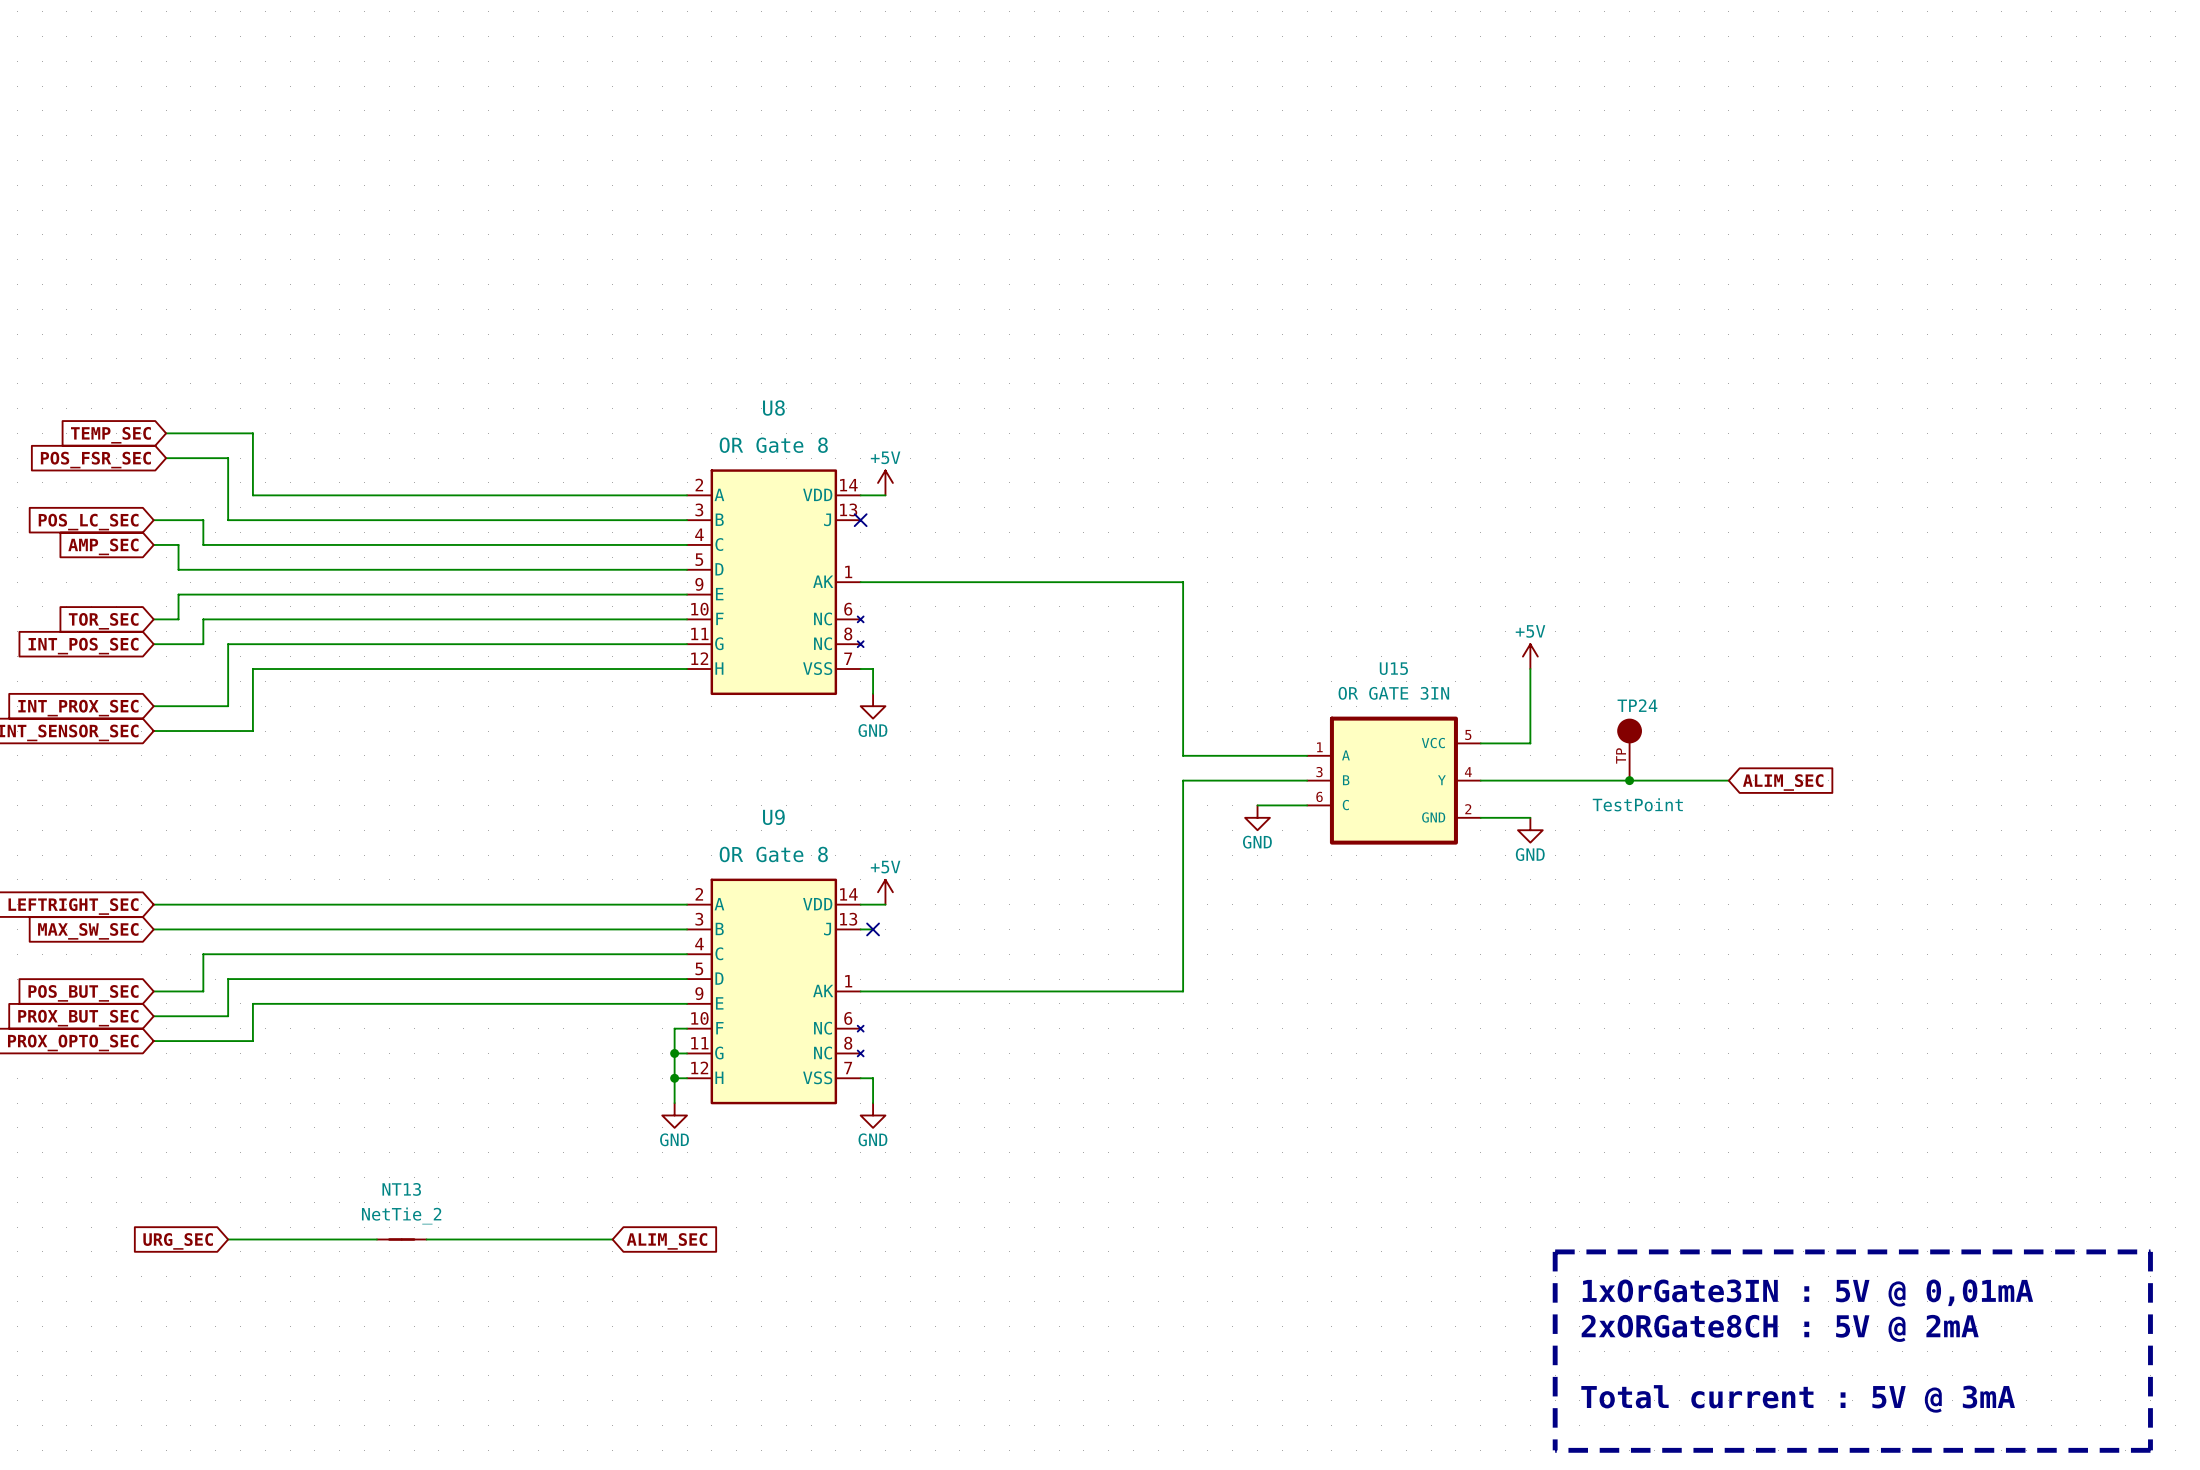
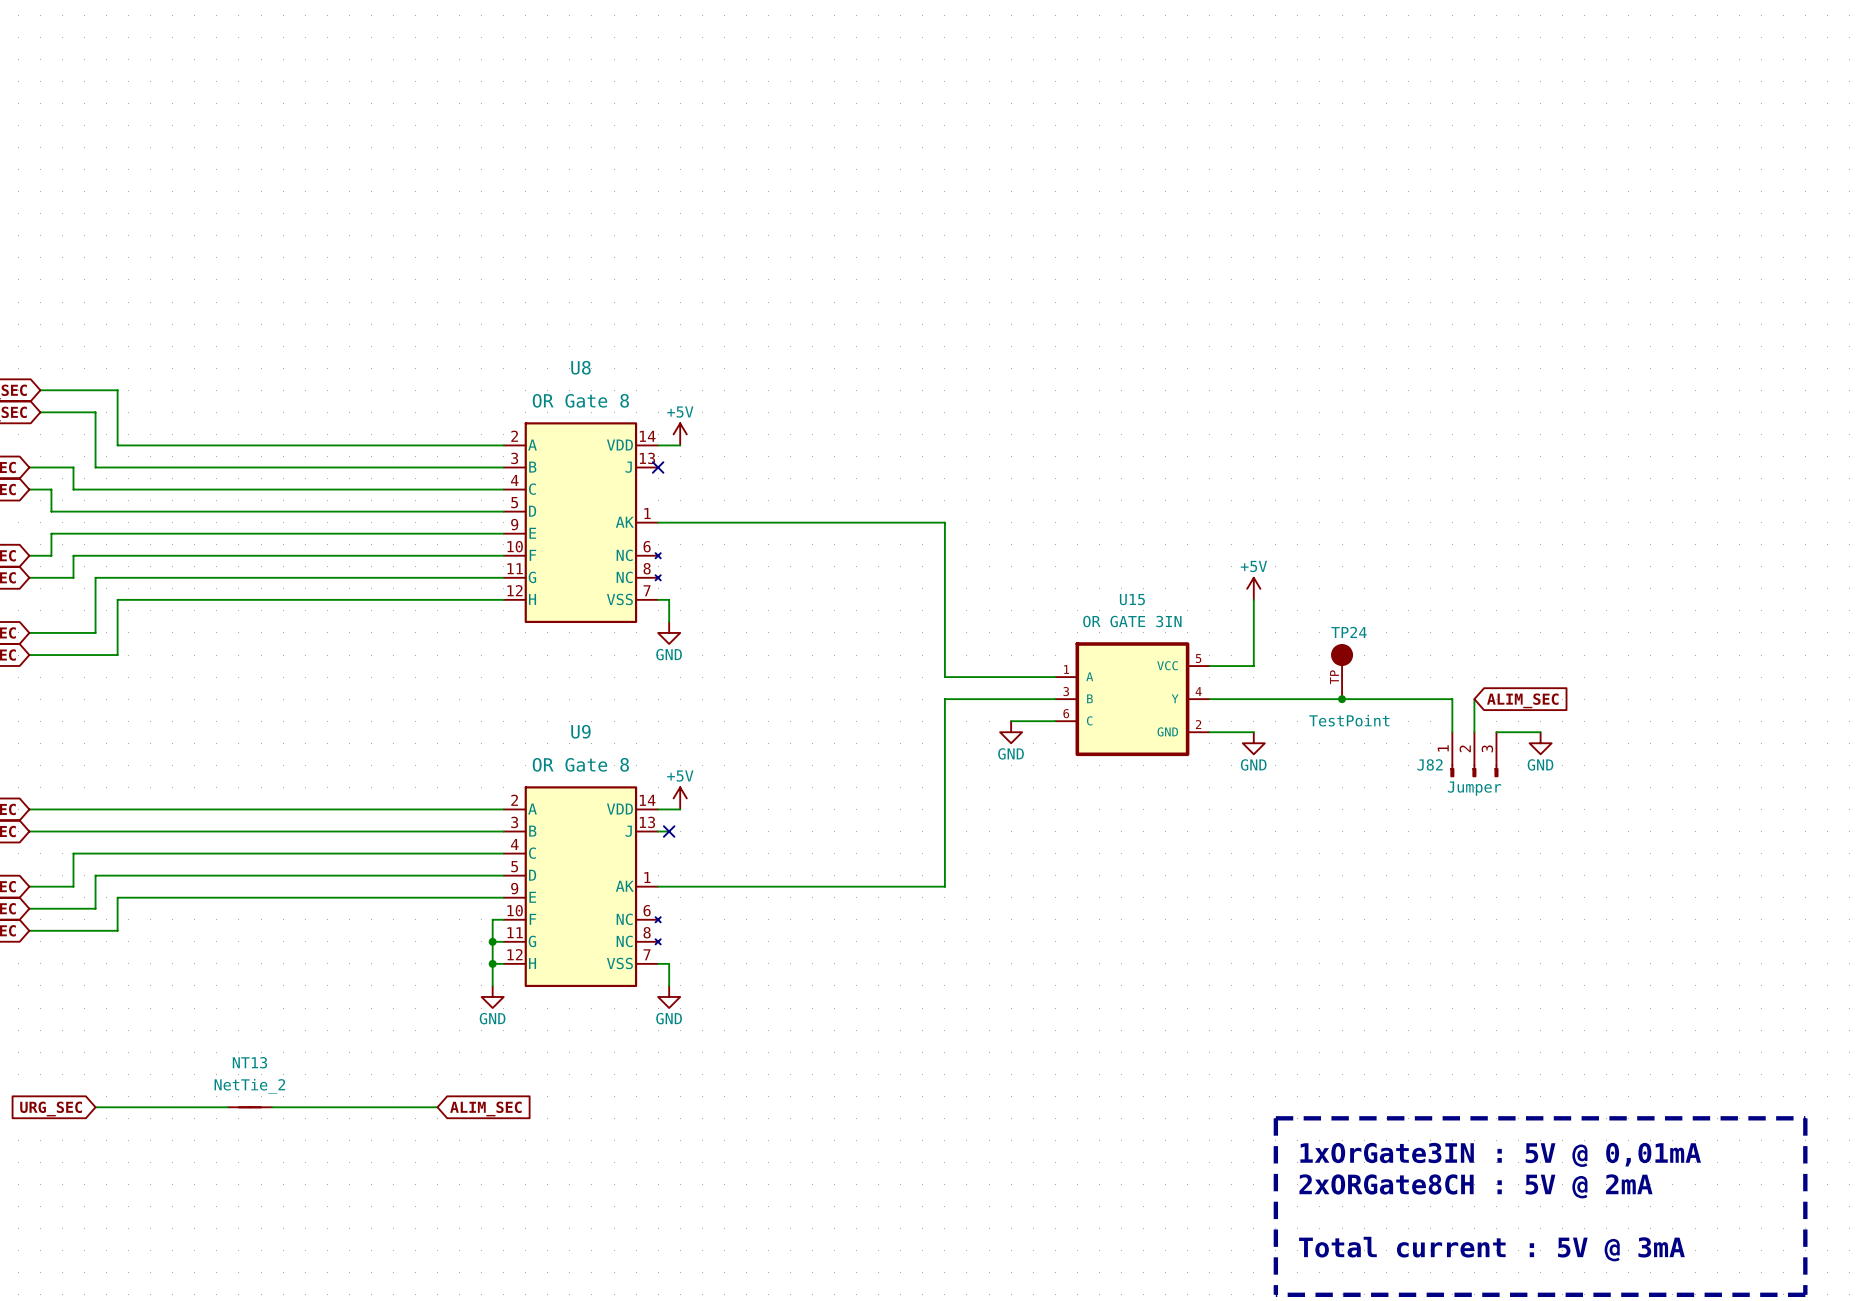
wire: none -> (1430, 699) (1452, 699) (1452, 732)
wire: none -> (1474, 699) (1474, 732)
global label position: ALIM_SEC (1783, 782) -> ALIM_SEC (1522, 700)
wire: none -> (1496, 732) (1540, 732)
power symbol: none -> GND (1540, 743)
J82: none -> Jumper (1474, 754)

